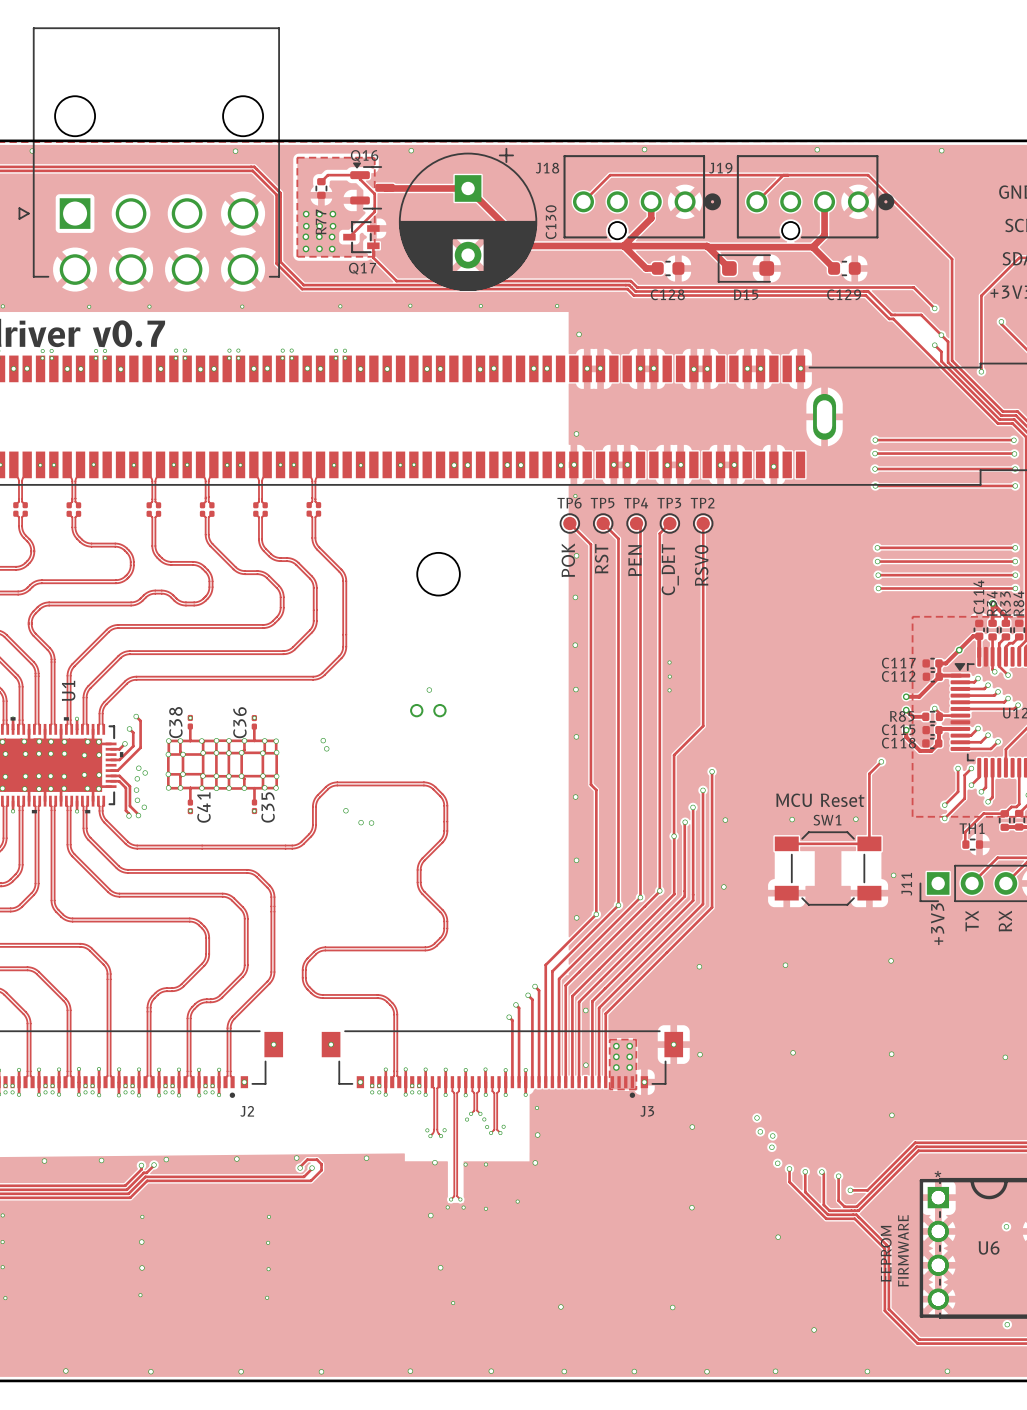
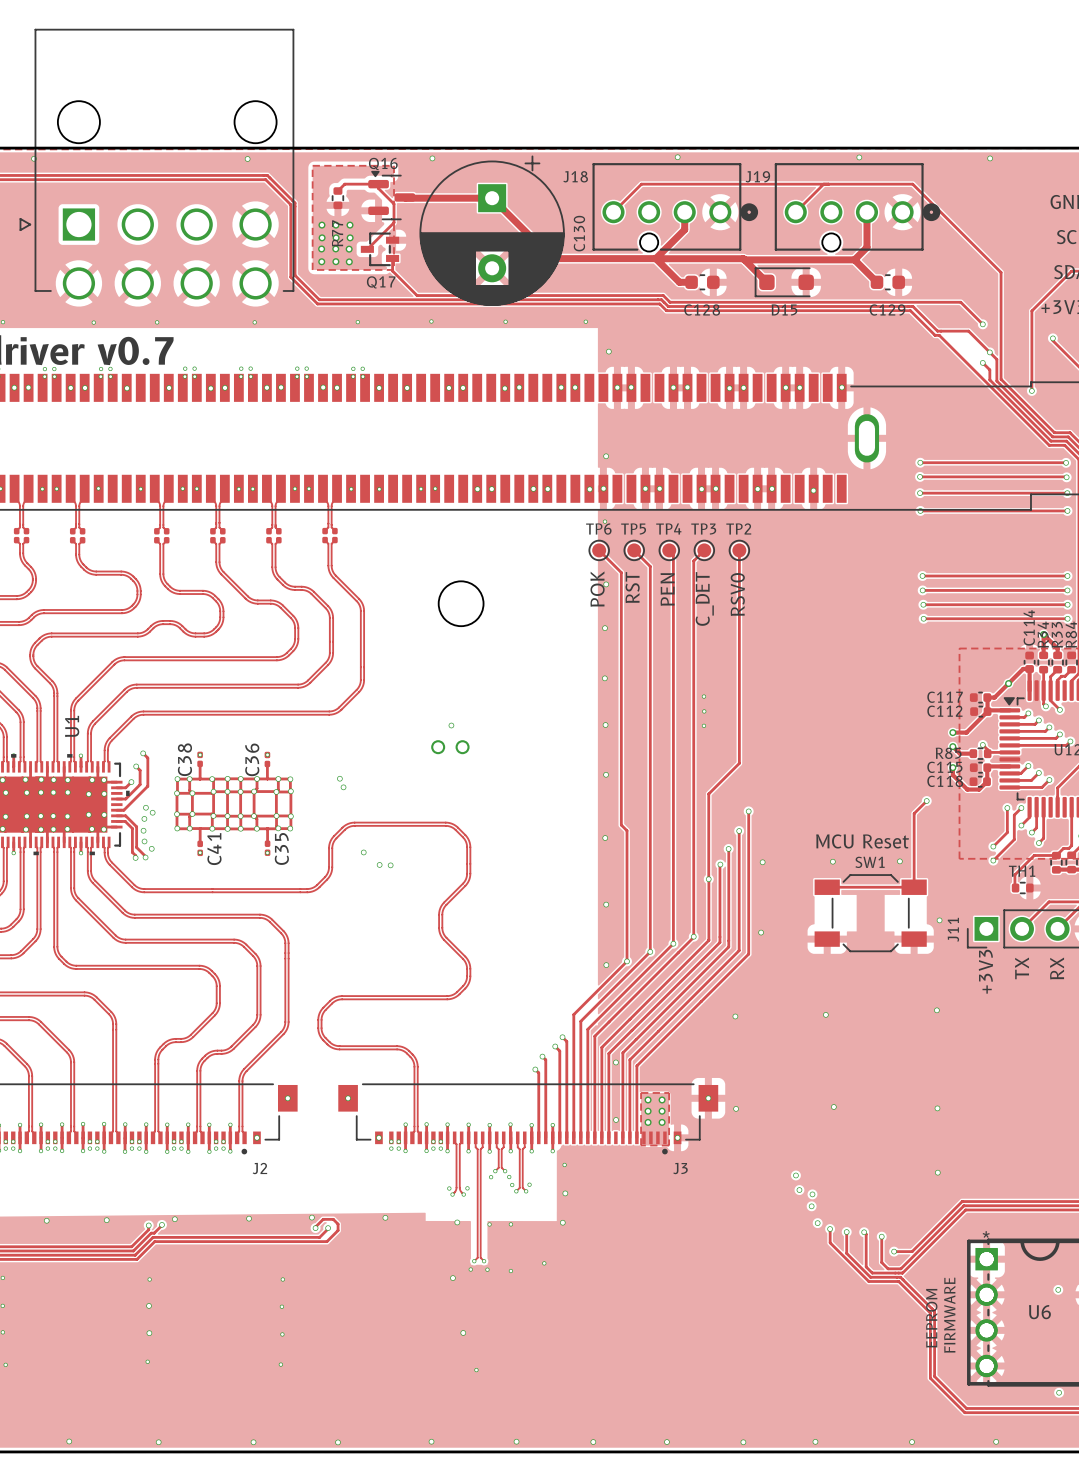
via: (1005, 1057) -> none
via: (692, 1127) -> none
via: (691, 1207) -> none
via: (778, 1237) -> none
via: (560, 1306) -> none
via: (672, 1307) -> none
via: (814, 1329) -> none

